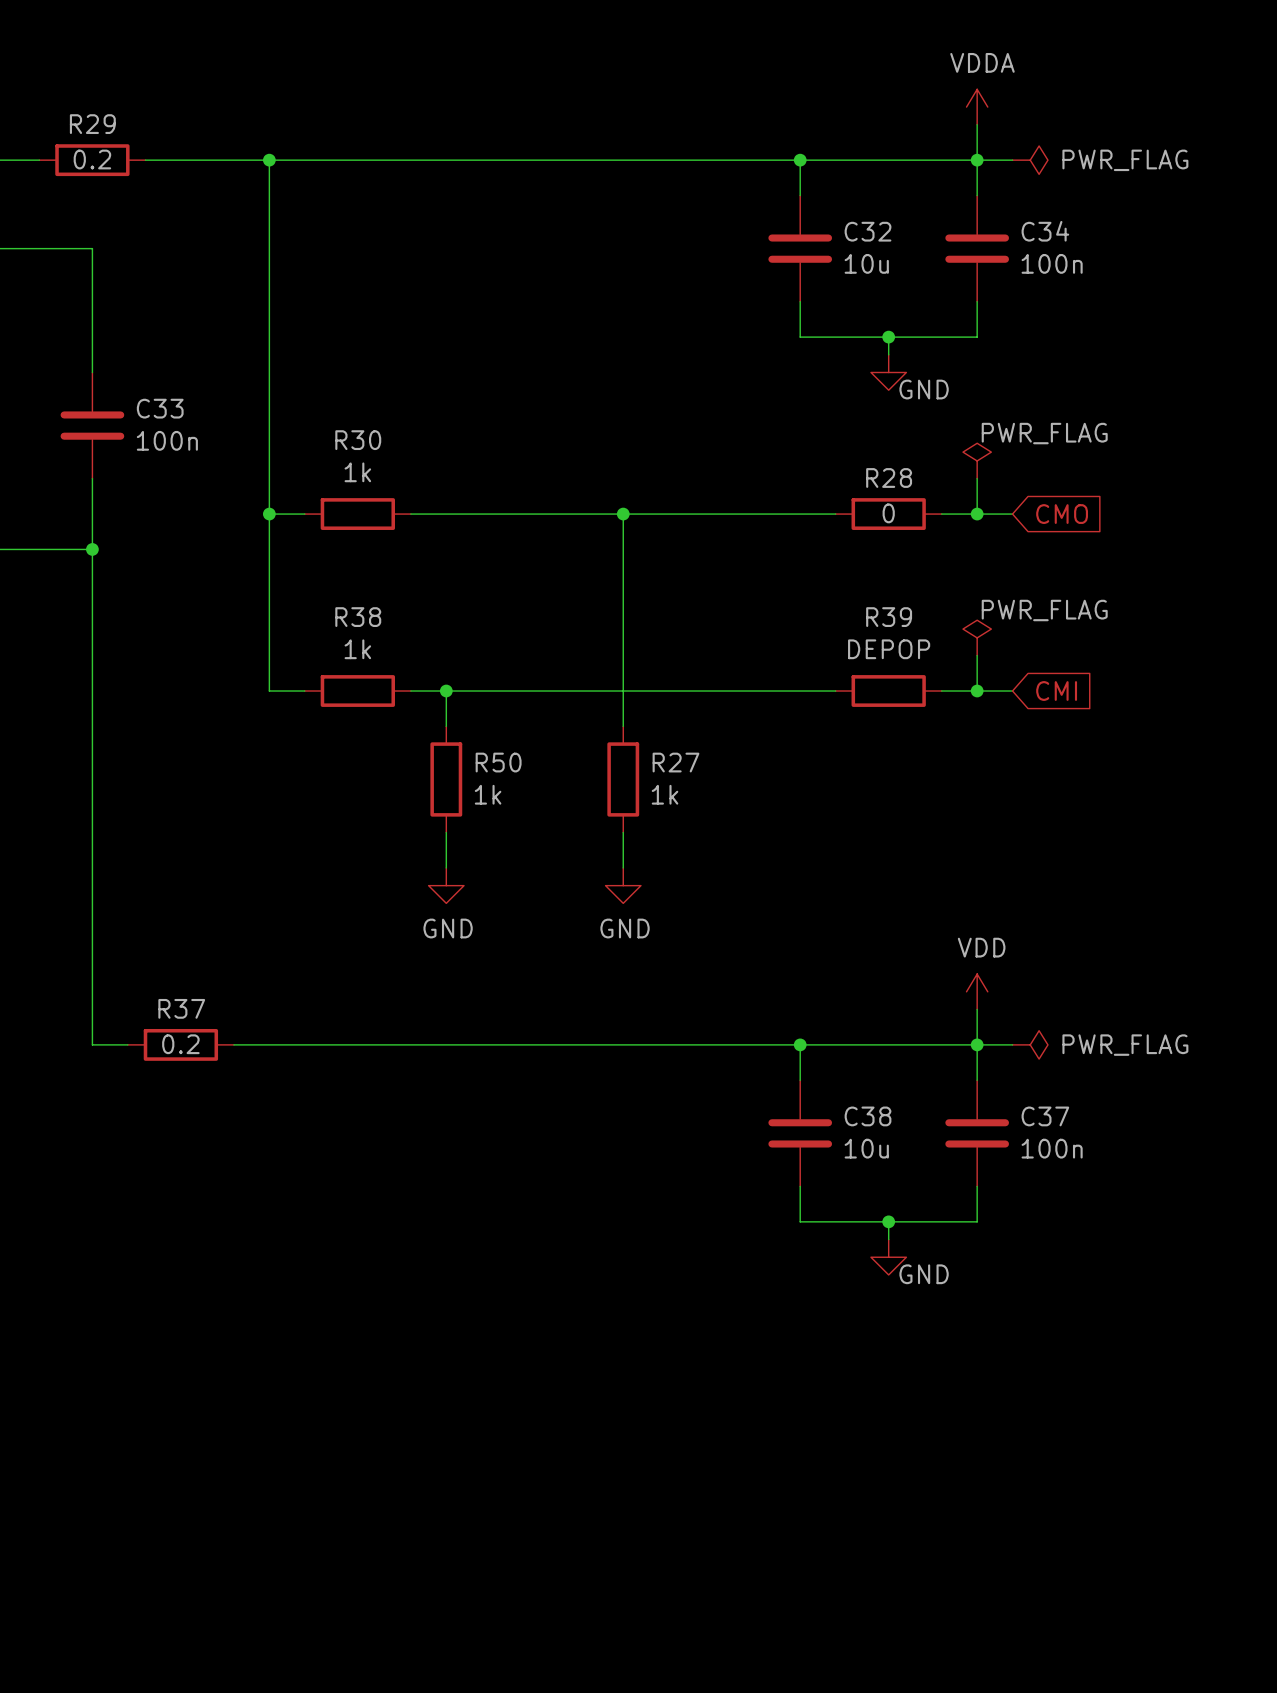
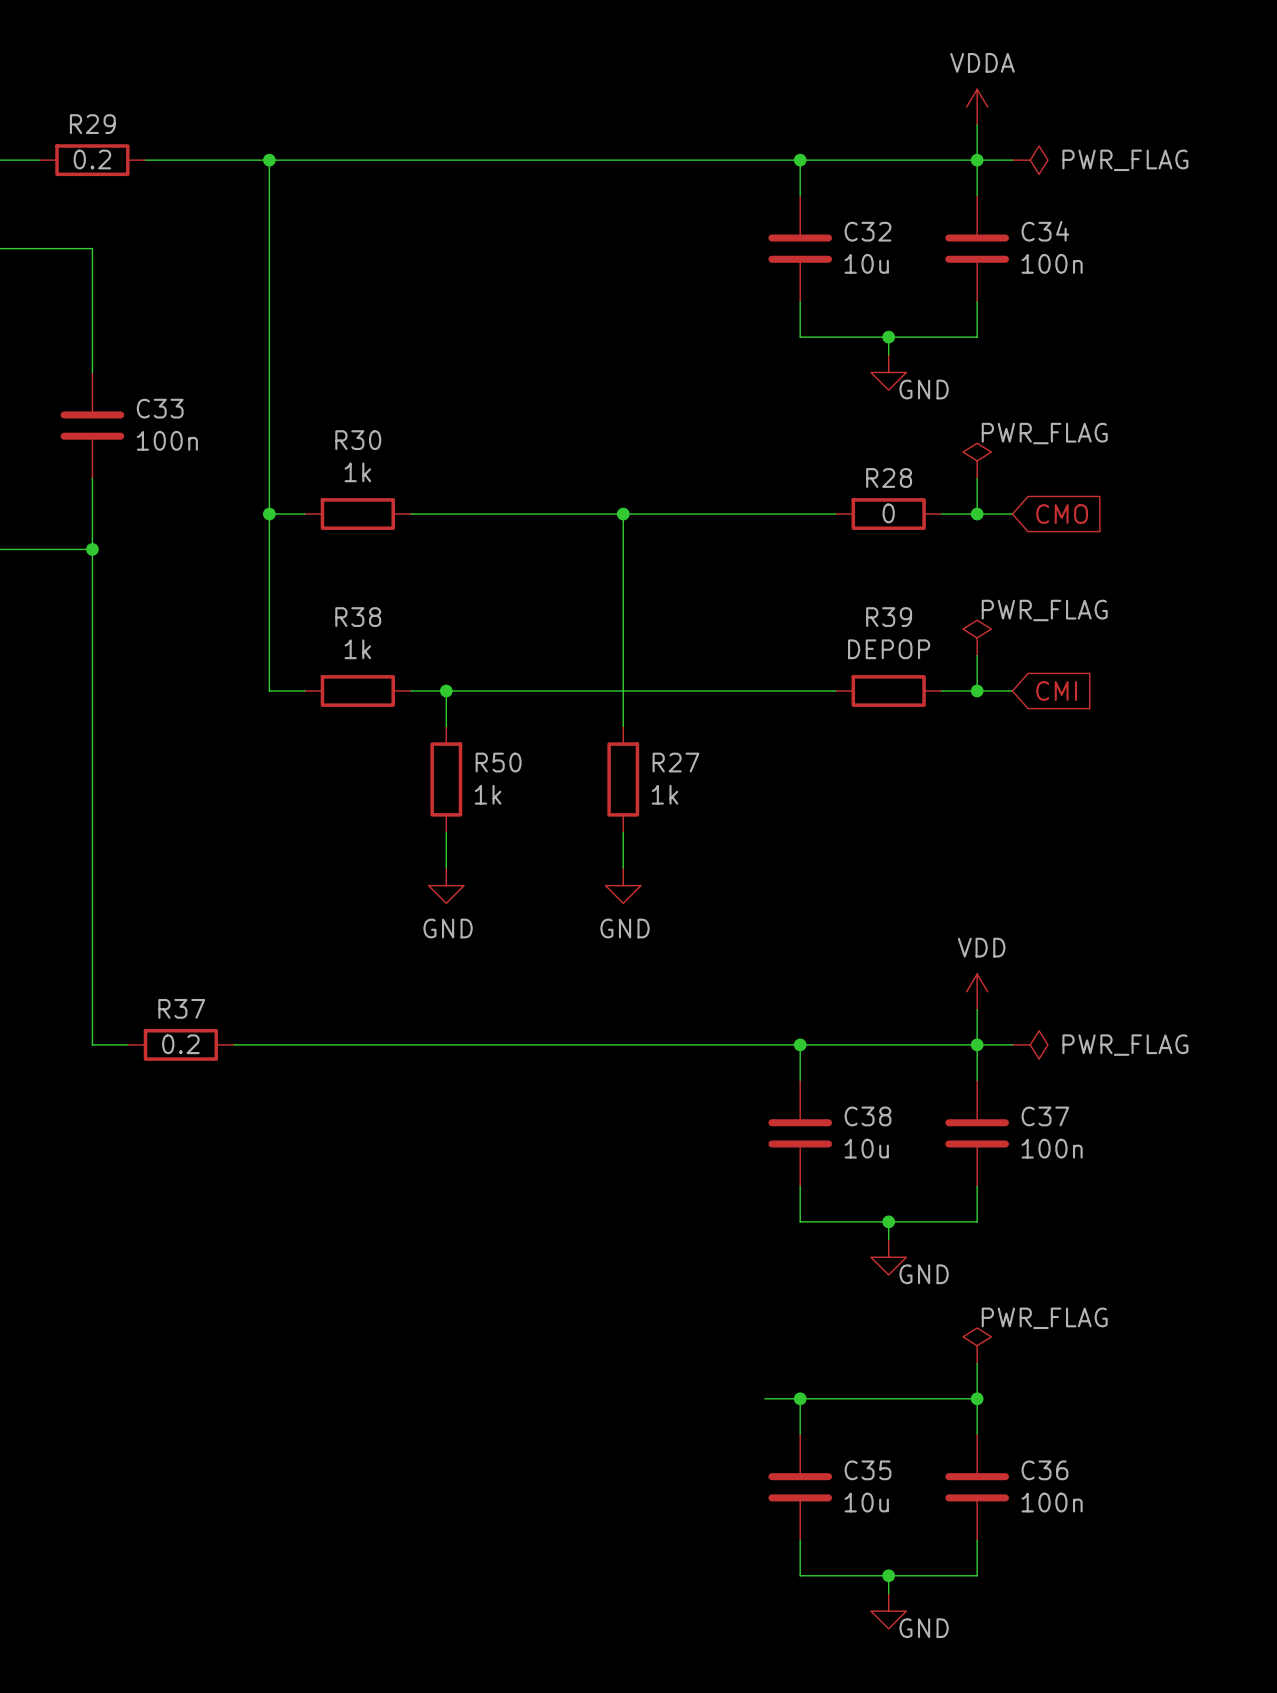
power symbol: none -> PWR_FLAG (977, 1345)
wire: none -> (977, 1363) (977, 1434)
wire: none -> (764, 1398) (977, 1398)
wire: none -> (800, 1398) (800, 1434)
junction: none -> (800, 1398)
junction: none -> (977, 1398)
C35: none -> 10u (800, 1487)
C36: none -> 100n (977, 1487)
wire: none -> (800, 1540) (800, 1575) (977, 1575) (977, 1540)
wire: none -> (888, 1575) (888, 1593)
junction: none -> (888, 1575)
power symbol: none -> GND (888, 1611)

